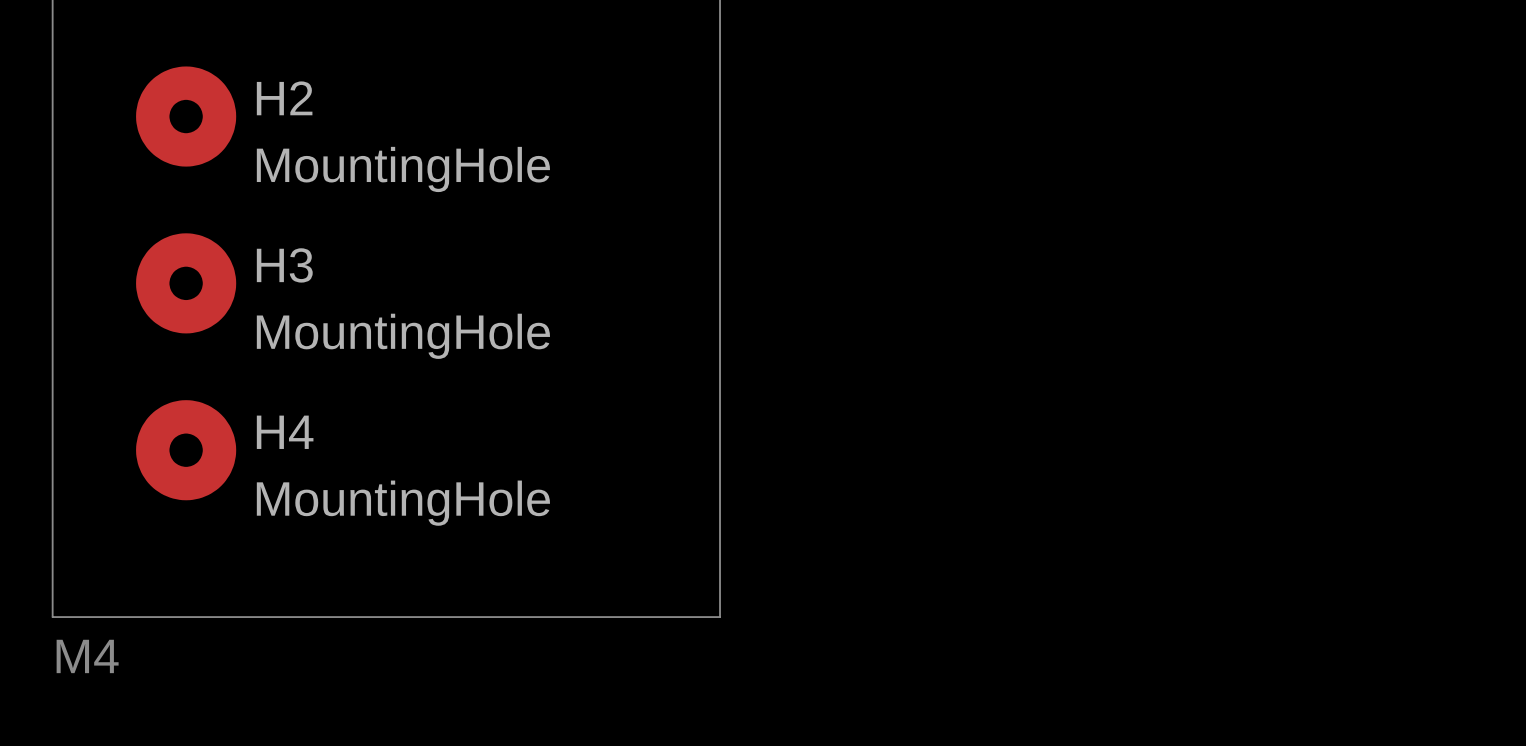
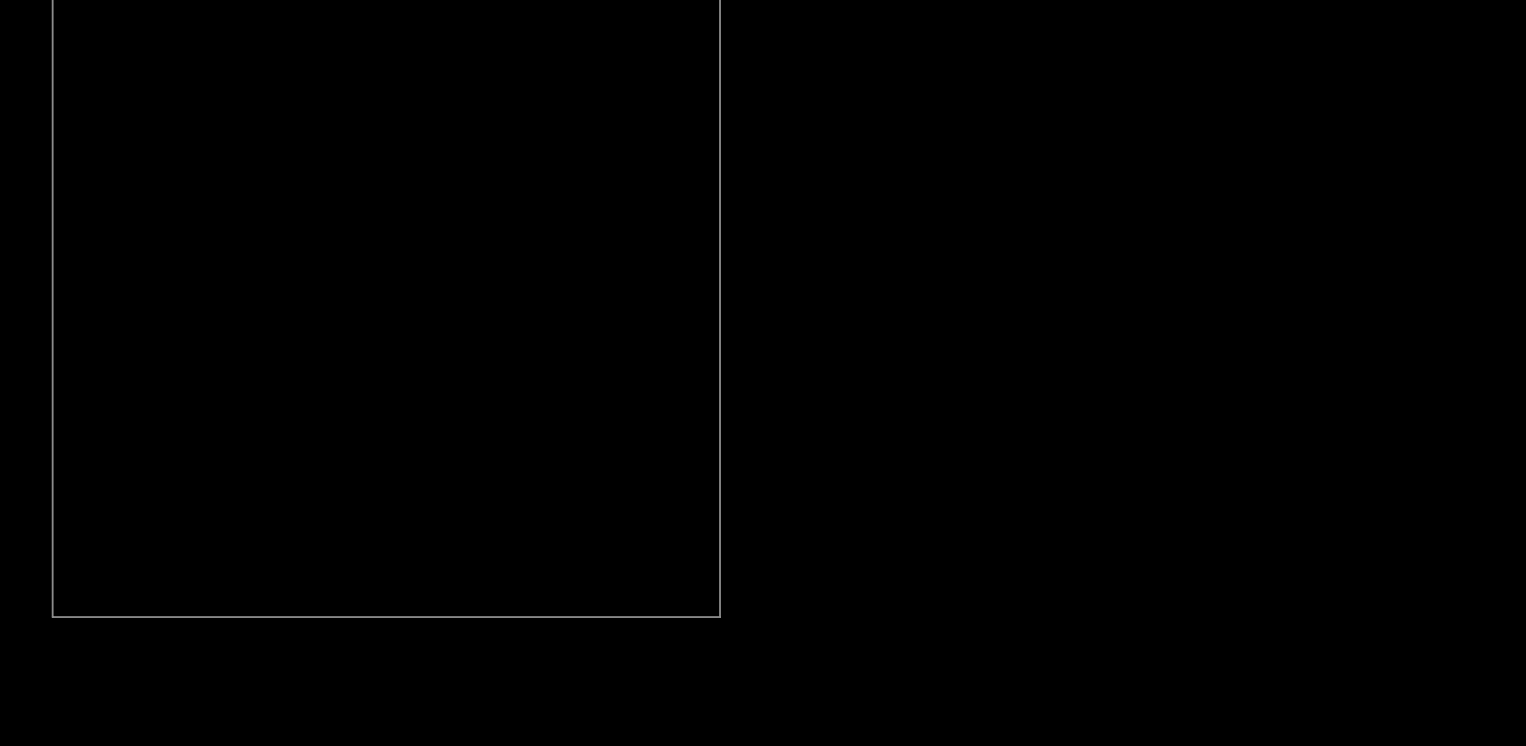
H2: MountingHole (186, 116) -> none
H3: MountingHole (186, 283) -> none
H4: MountingHole (186, 450) -> none
text: M4 (87, 656) -> none

